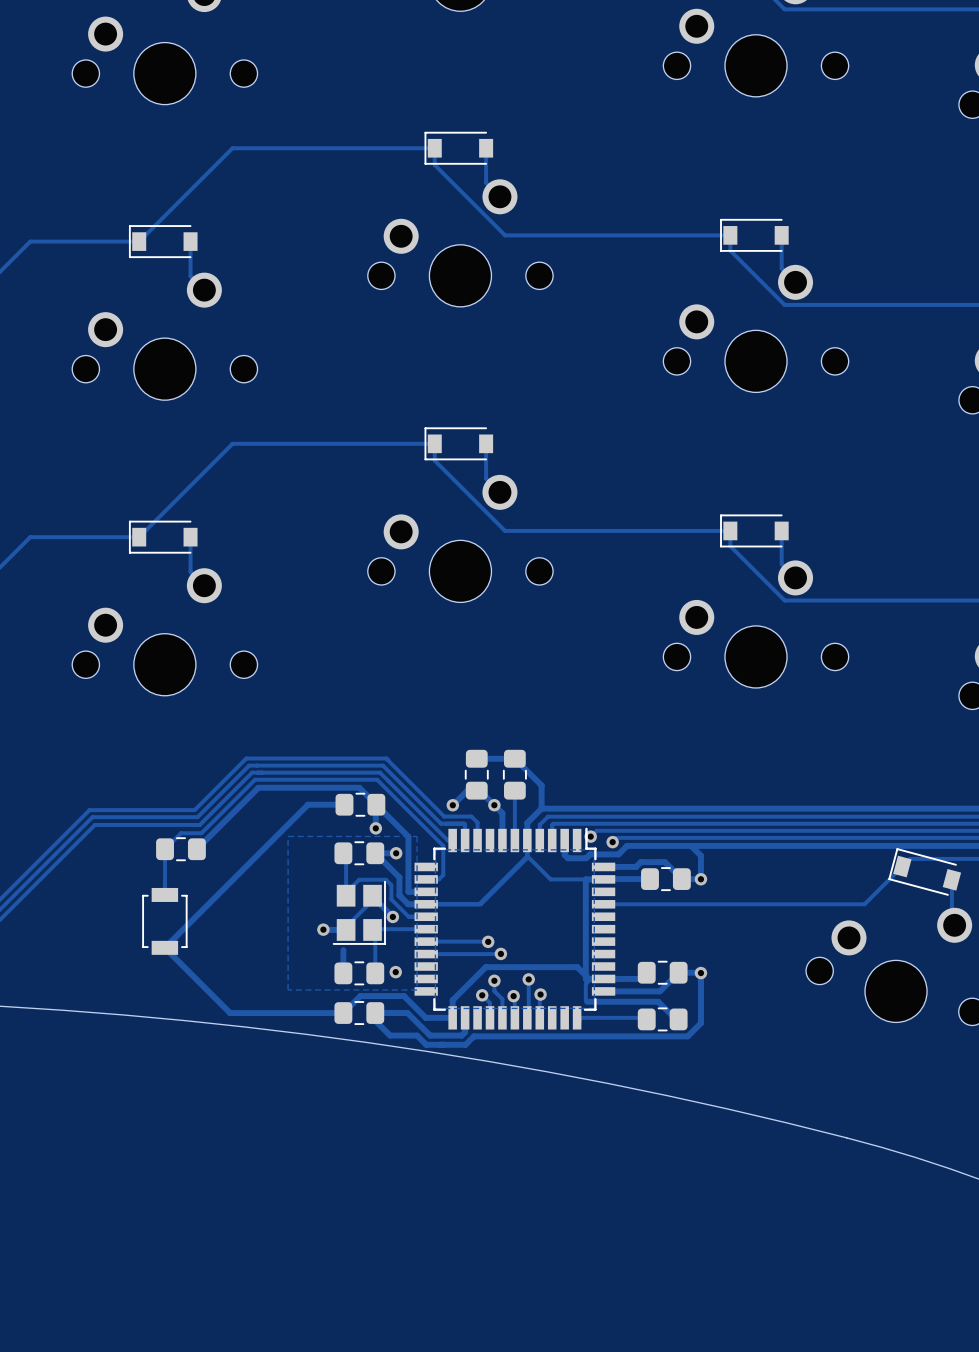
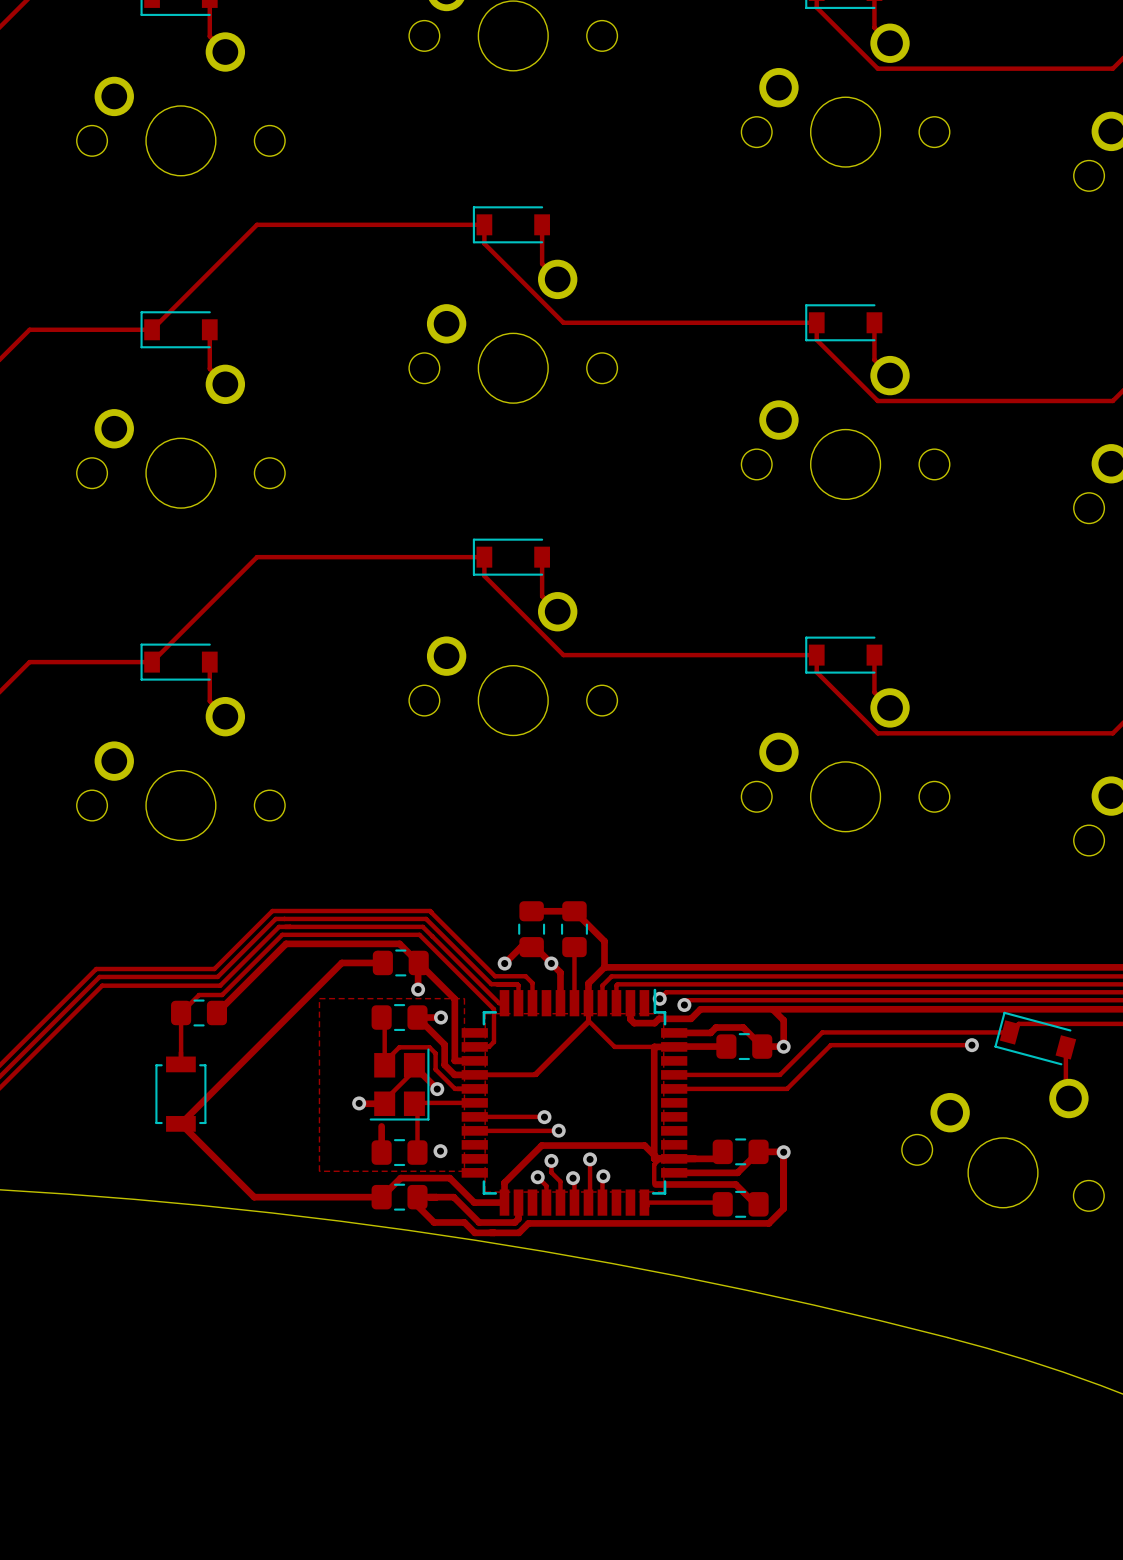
track: (902, 866) (864, 904) (697, 904) -> (1010, 1032) (822, 1032) (779, 1074)
track: none -> (971, 1045) (830, 1045) (787, 1088) (674, 1088)
via: none -> (971, 1045)

